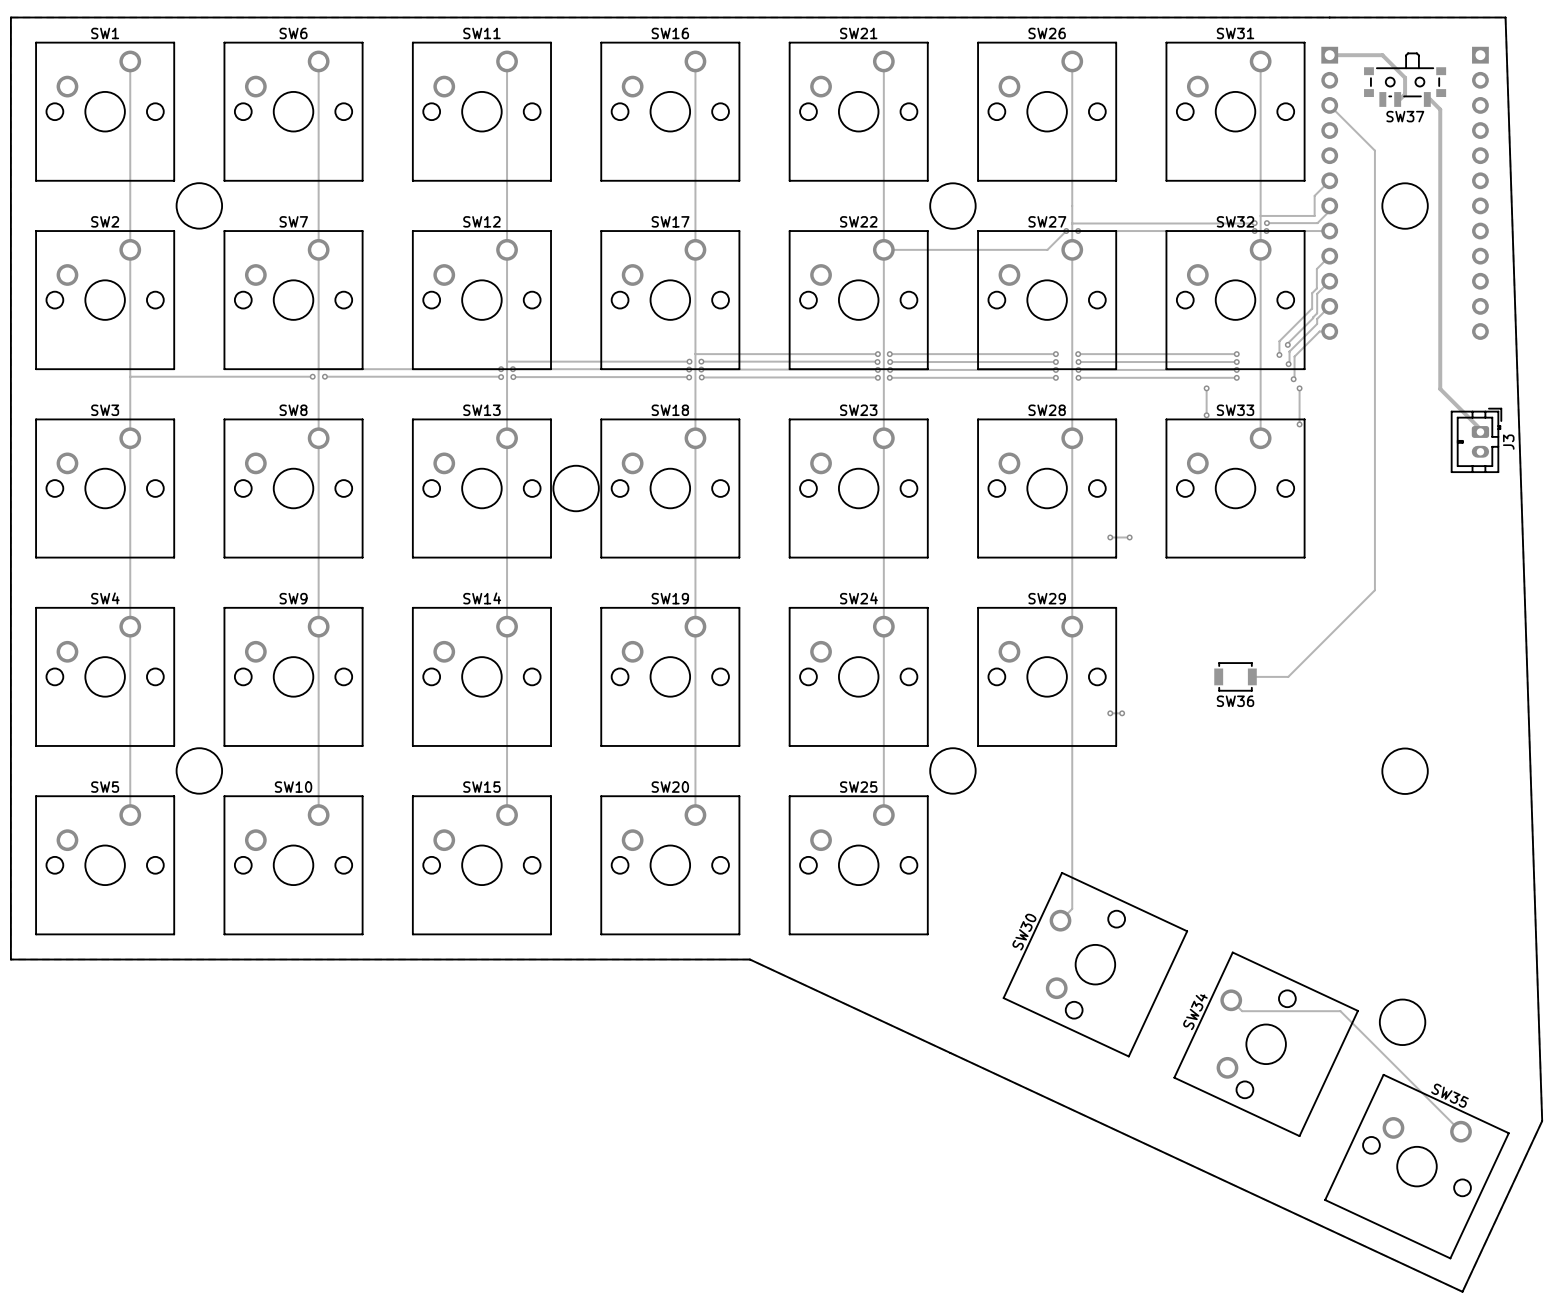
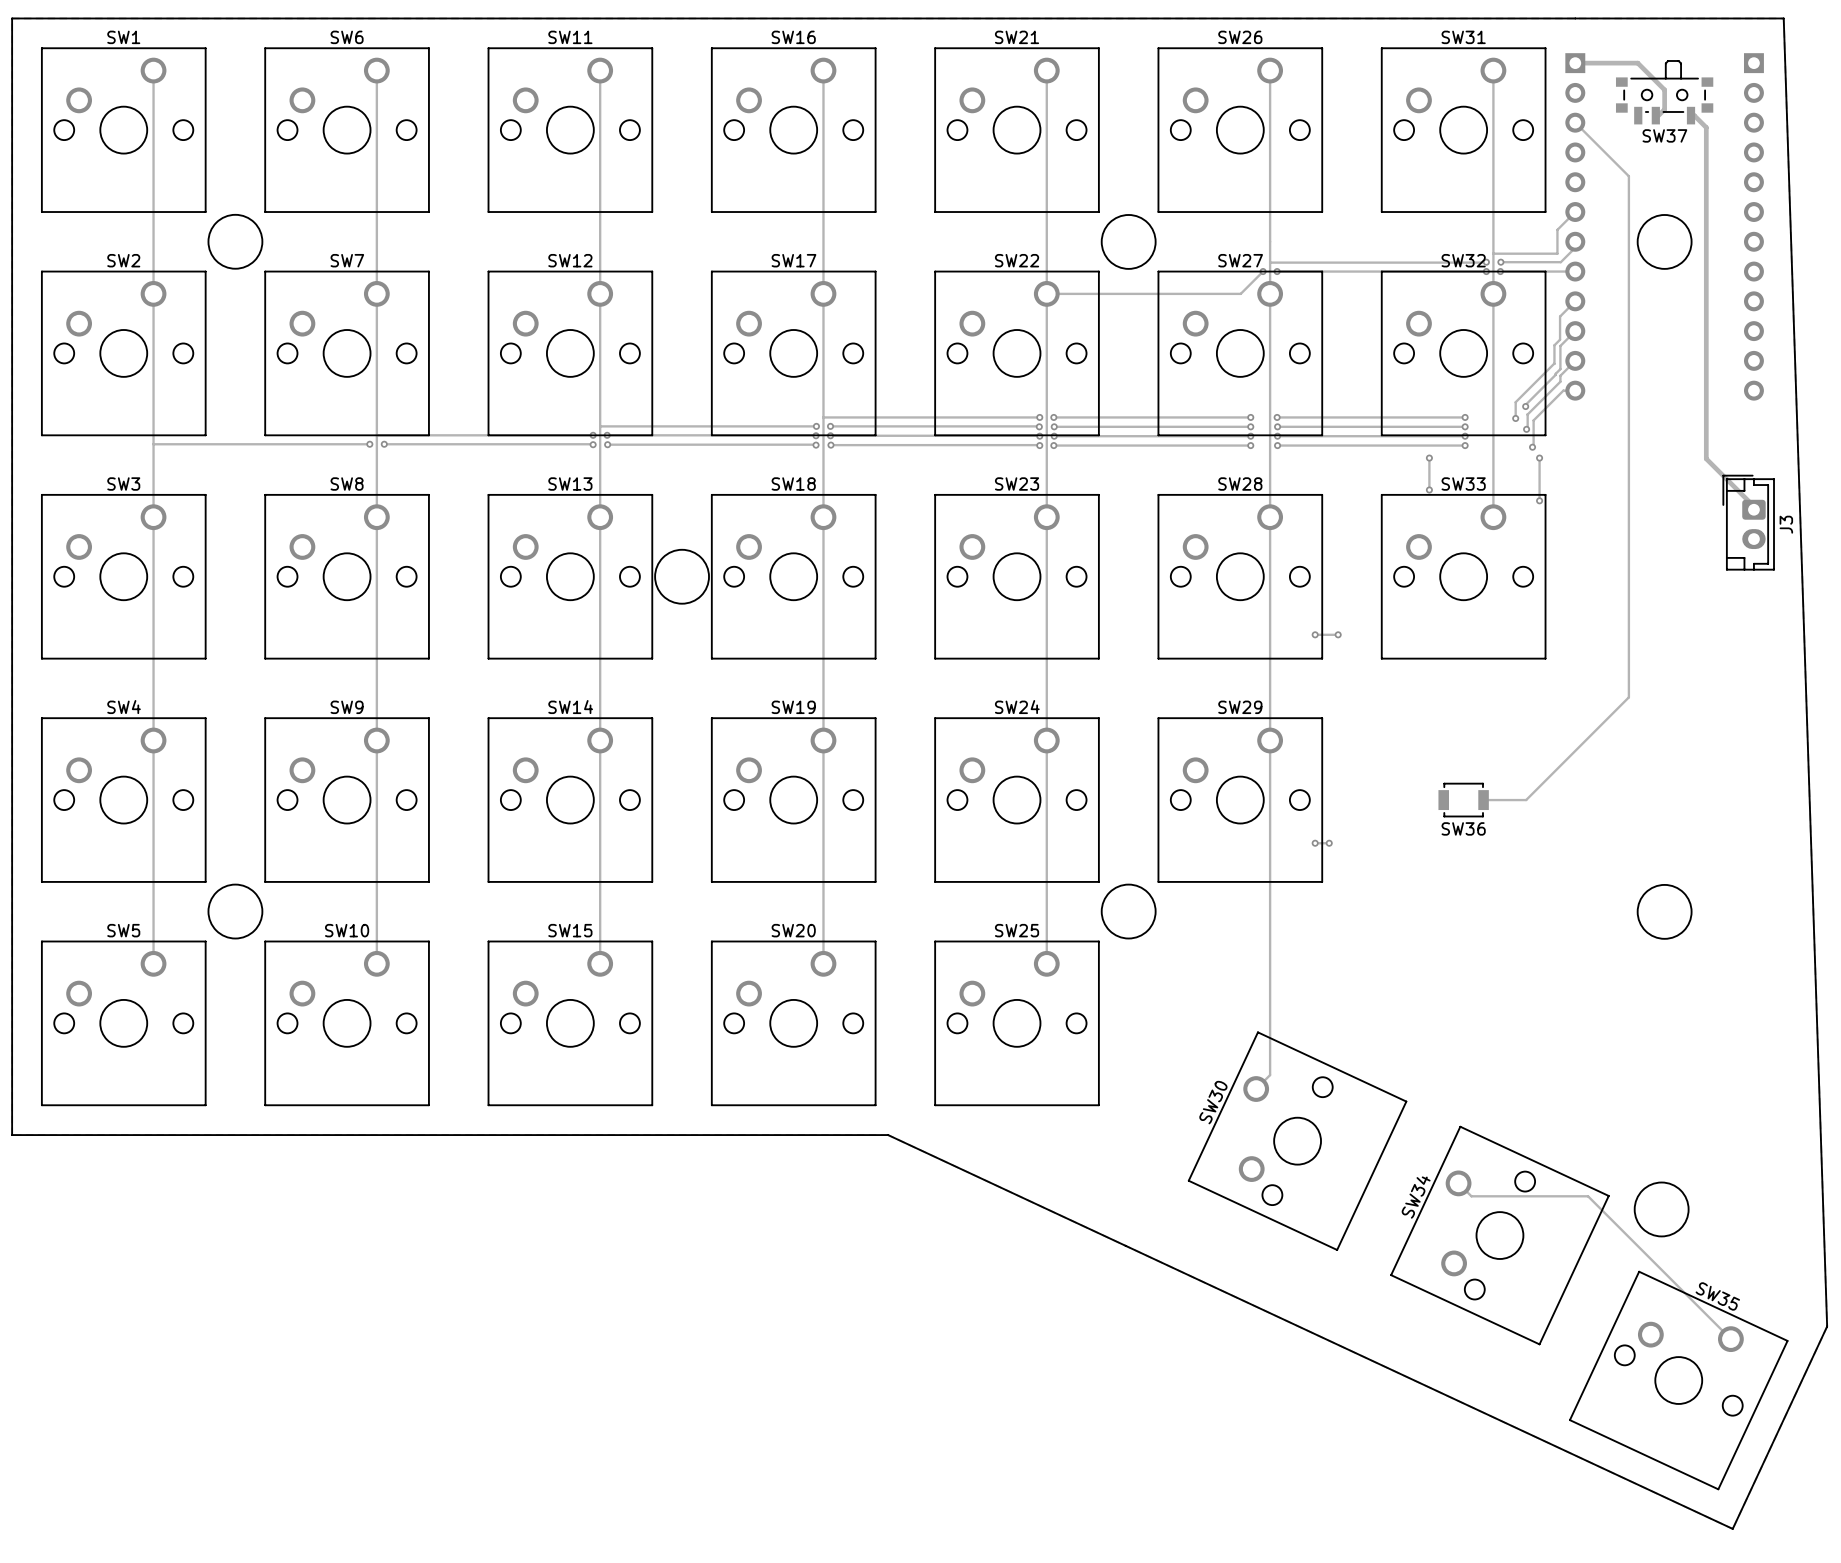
J3 footprint: [1451, 408, 1502, 473] -> [1722, 474, 1775, 571]

